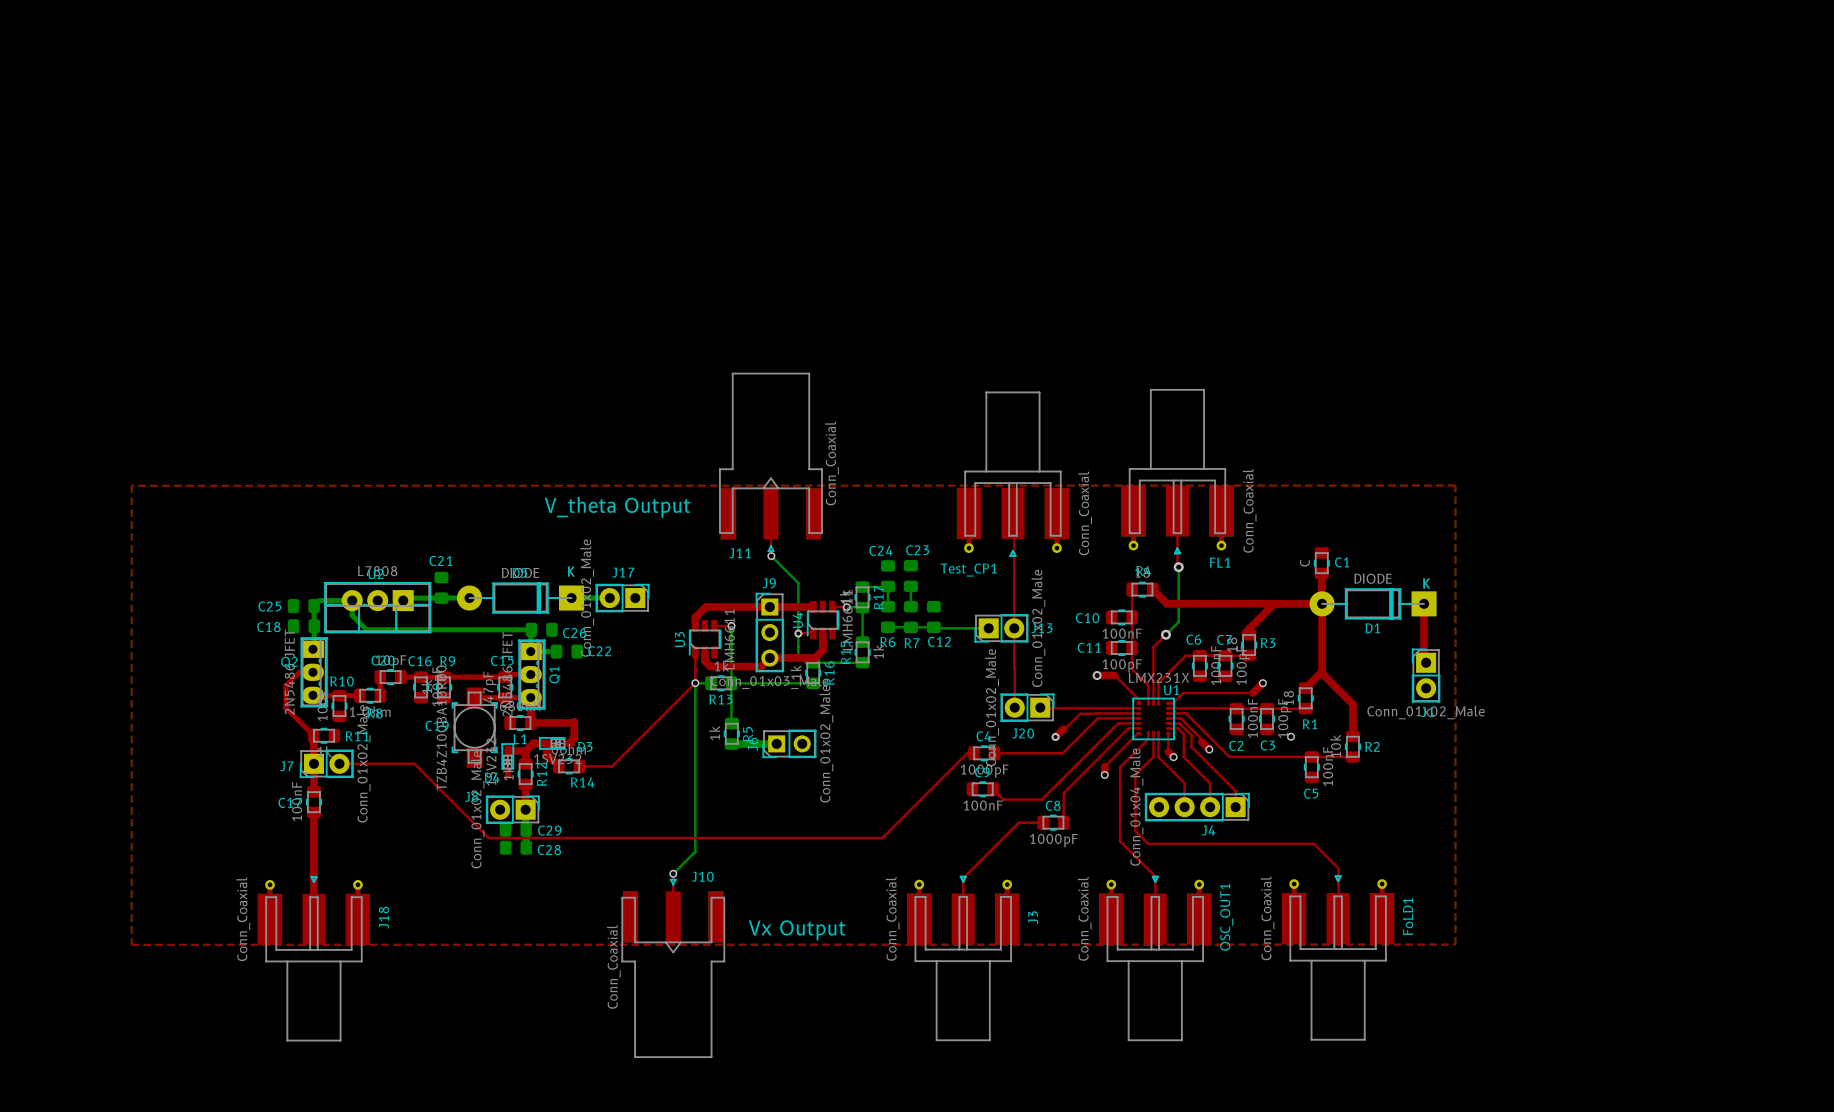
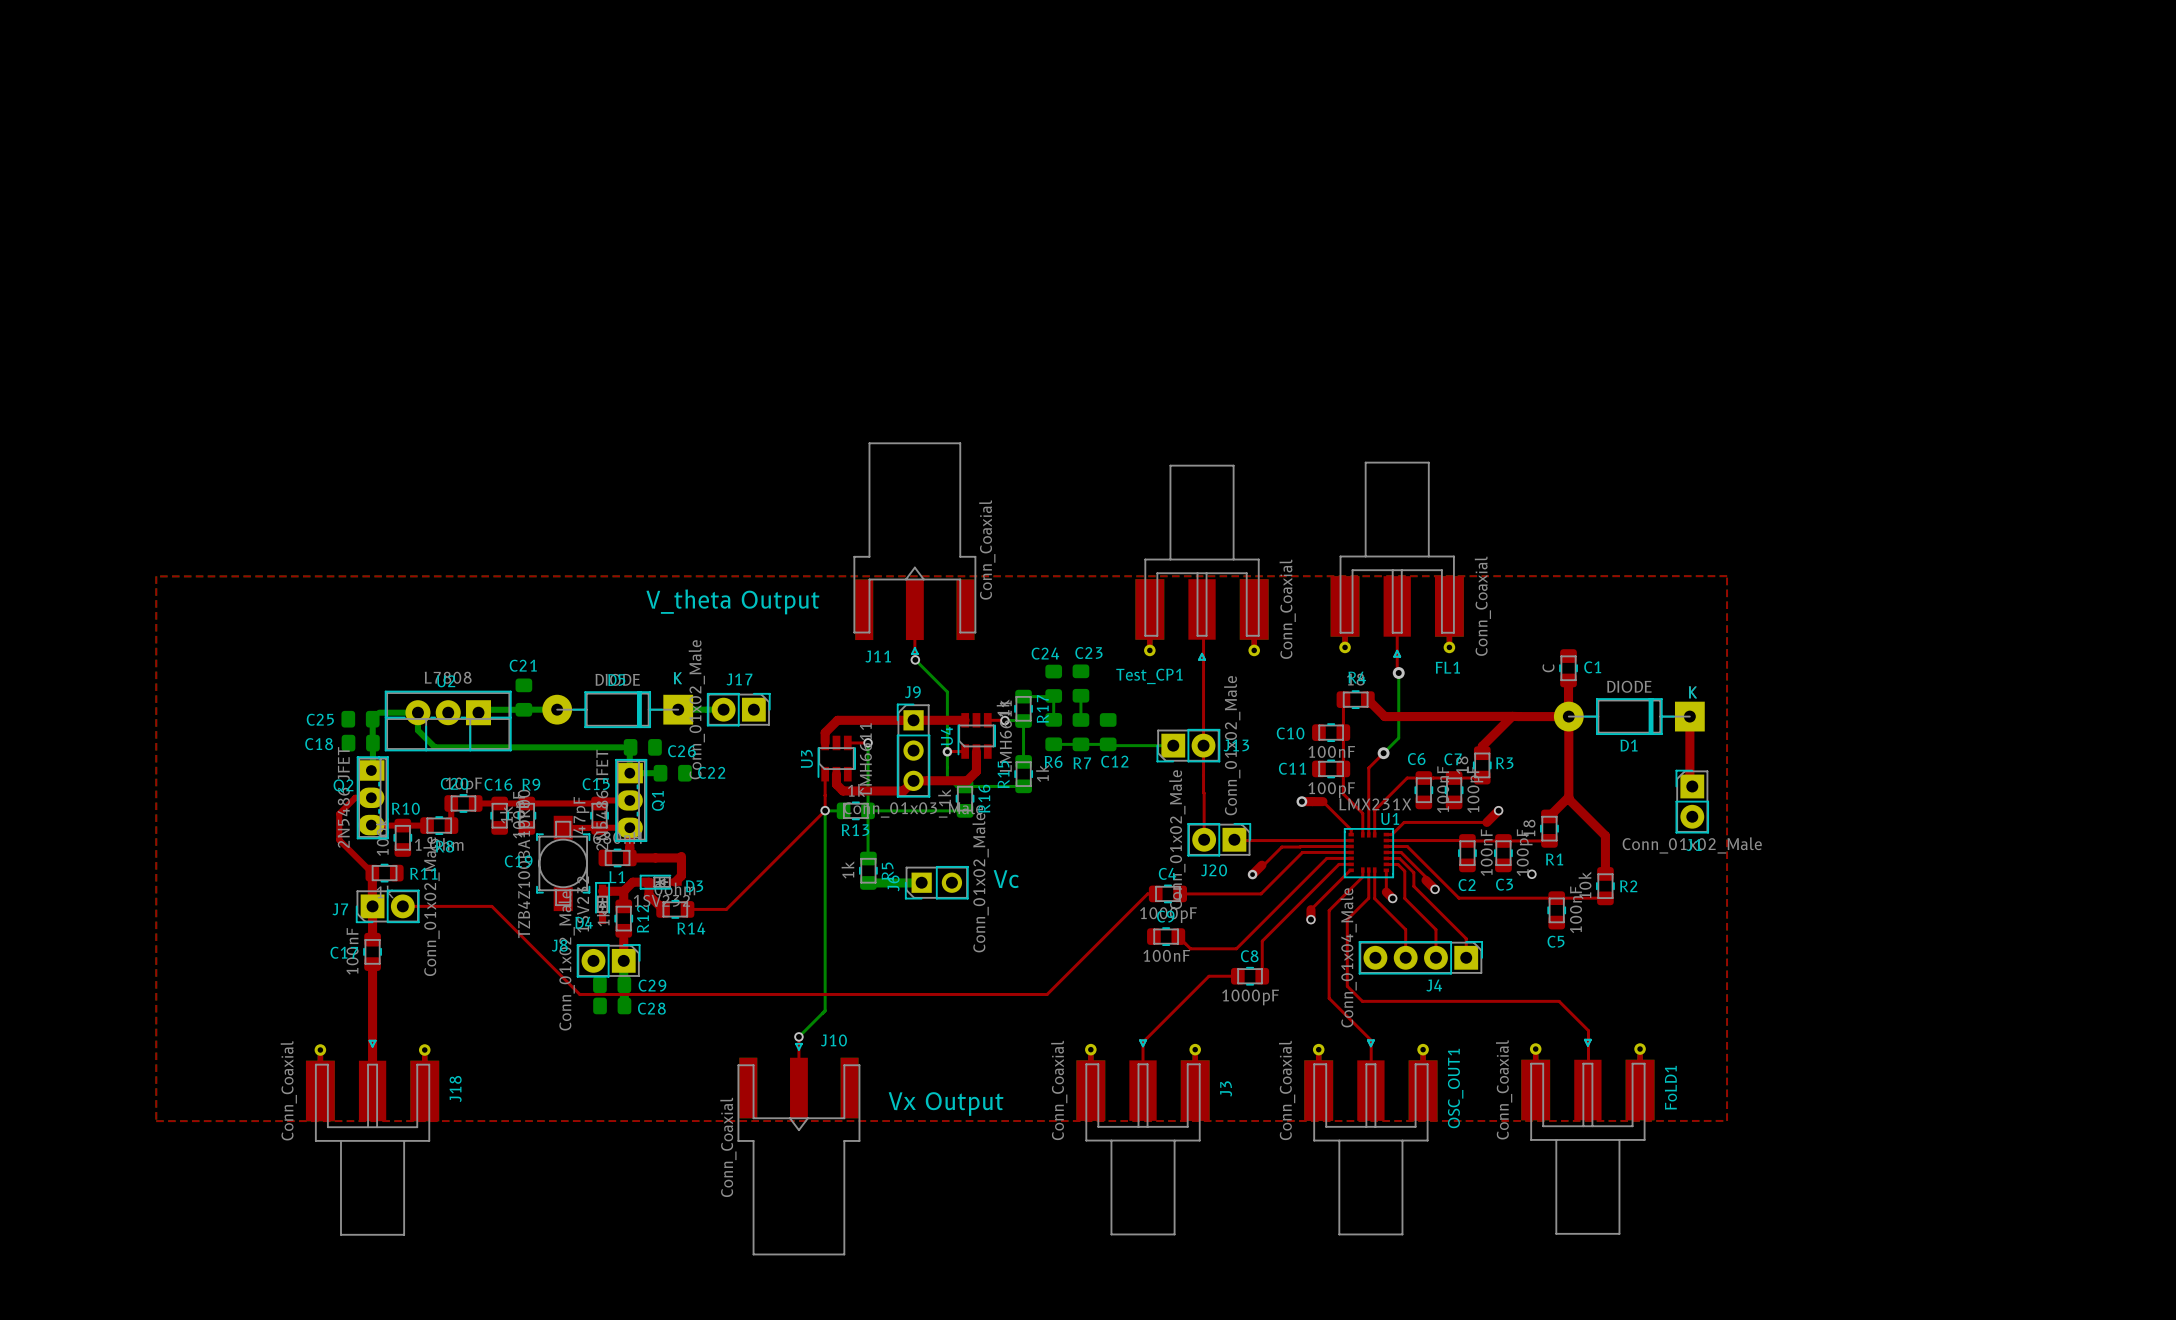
text: none -> Vc (1006, 879)

